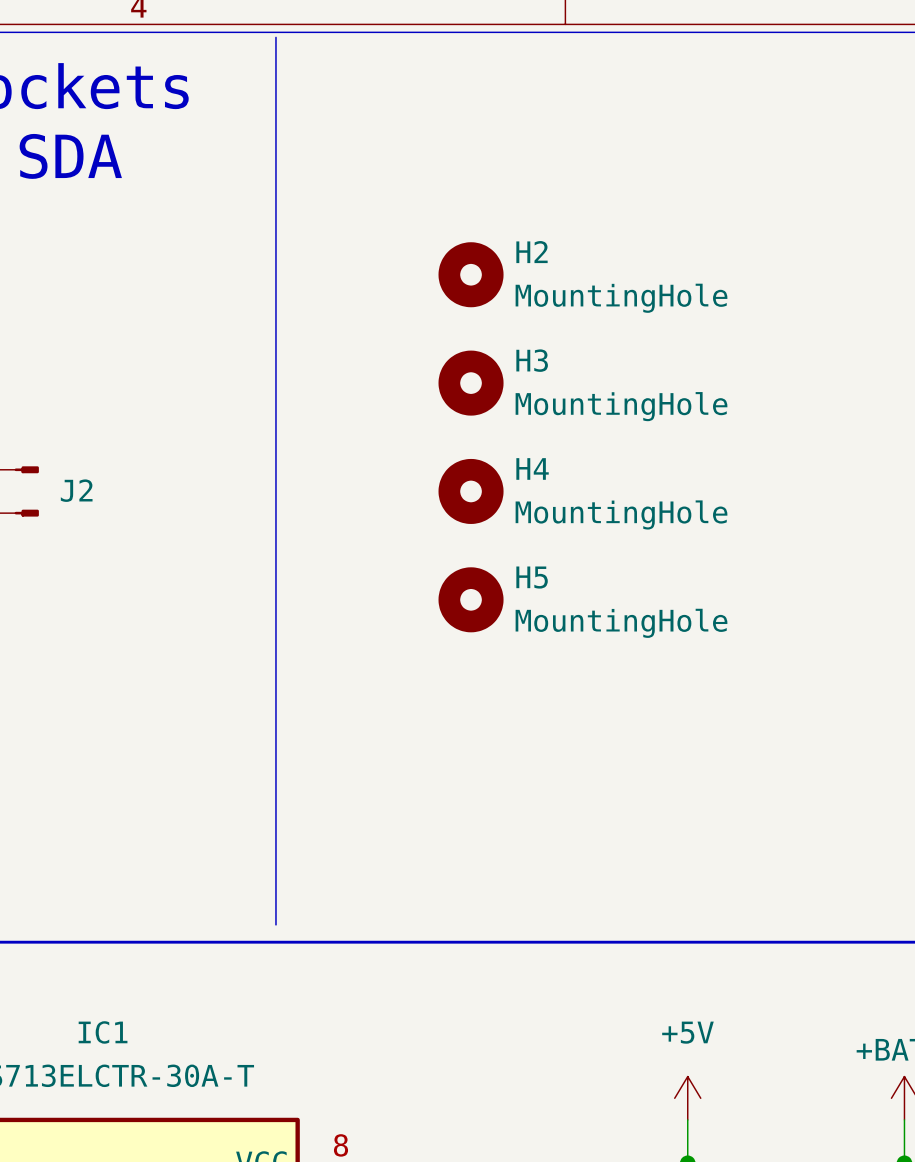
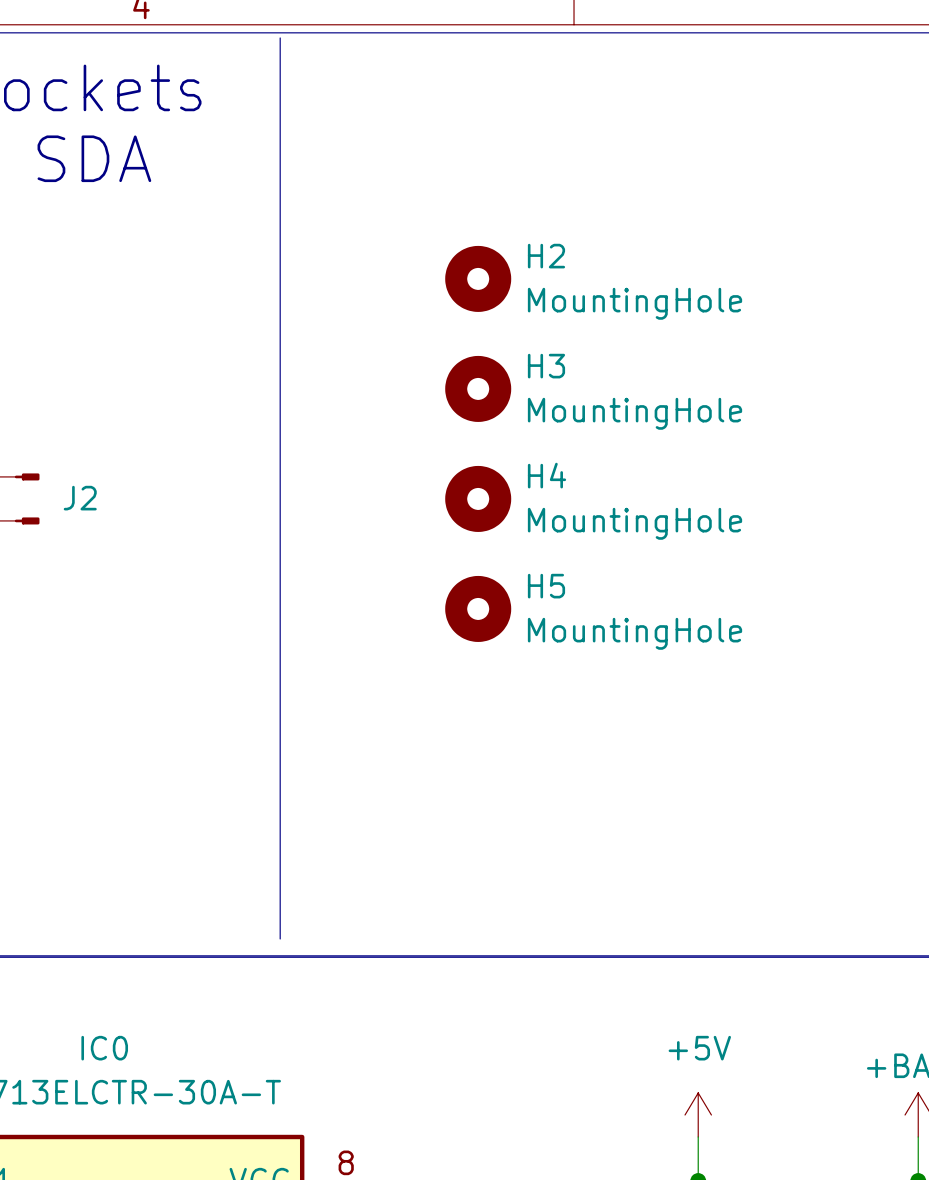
IC1 name: IC1 (103, 1032) -> IC0 (104, 1048)

